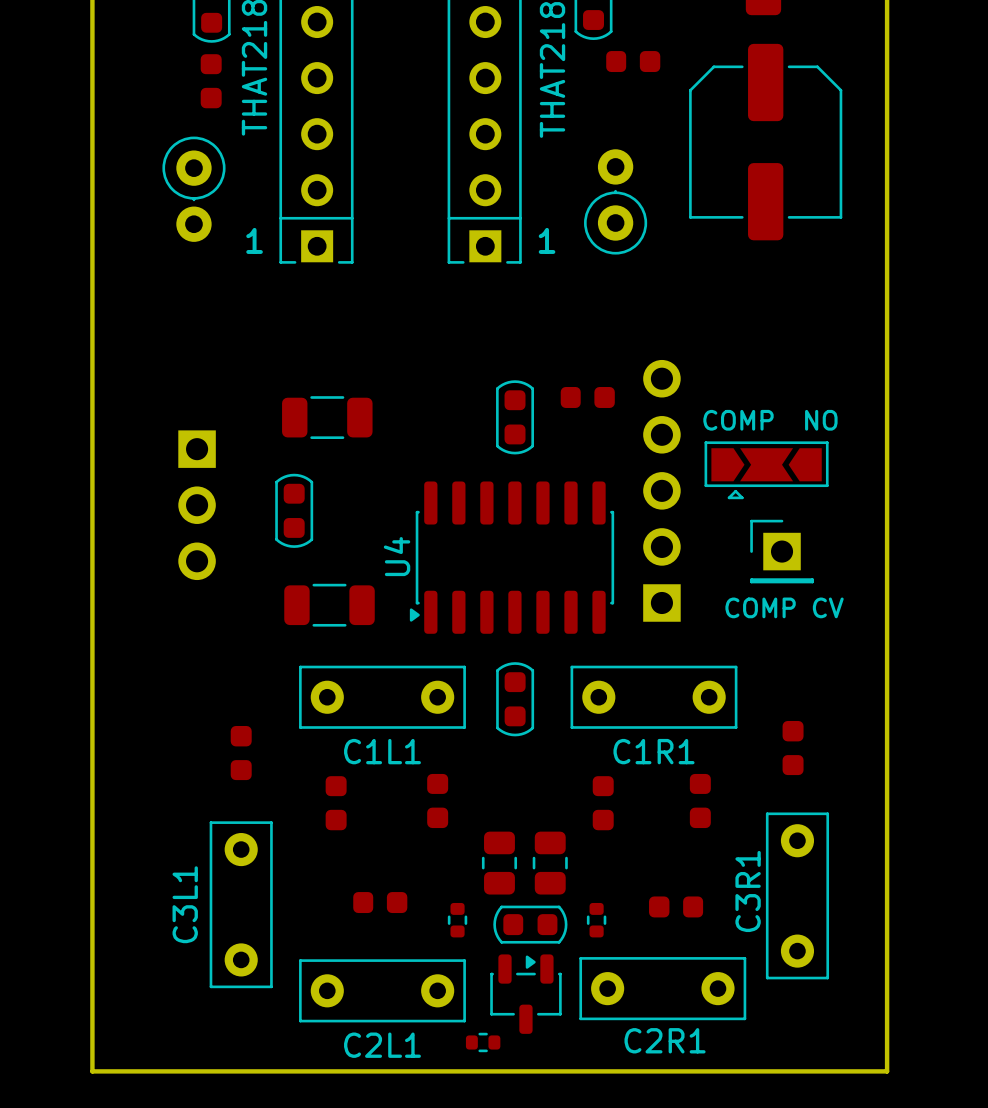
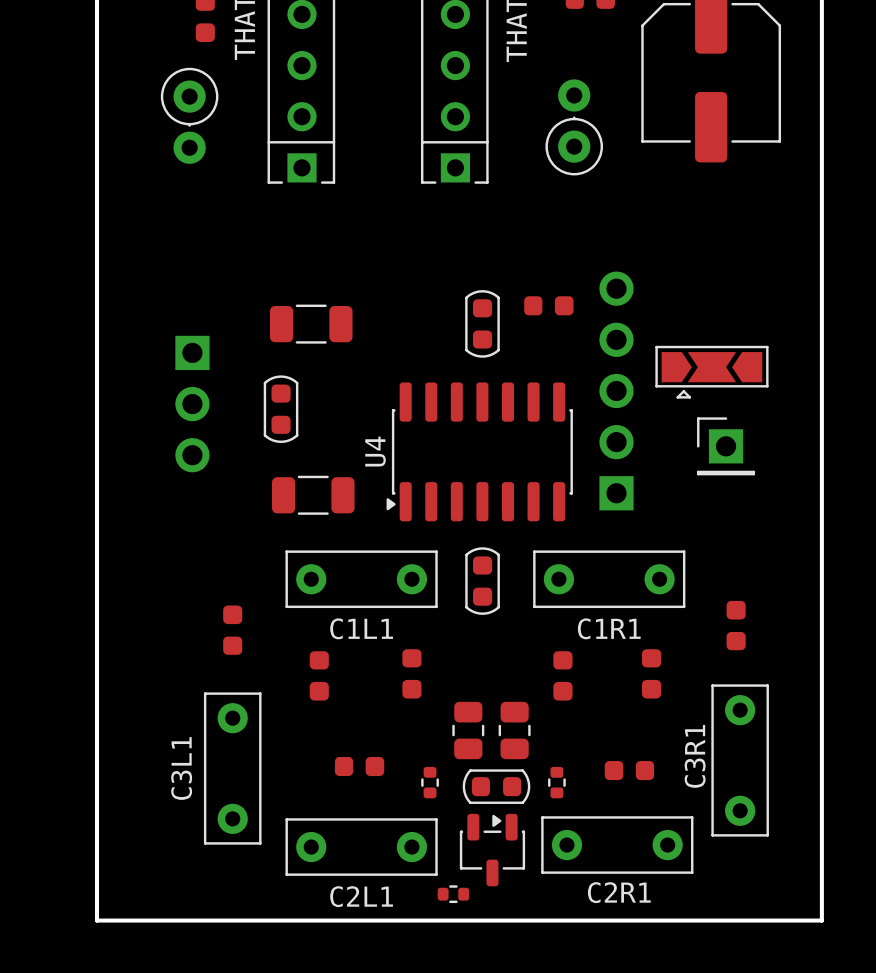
text: 1 (254, 240) -> none
text: 1 (547, 240) -> none
text: COMP NO (770, 420) -> none
text: COMP CV (784, 607) -> none

